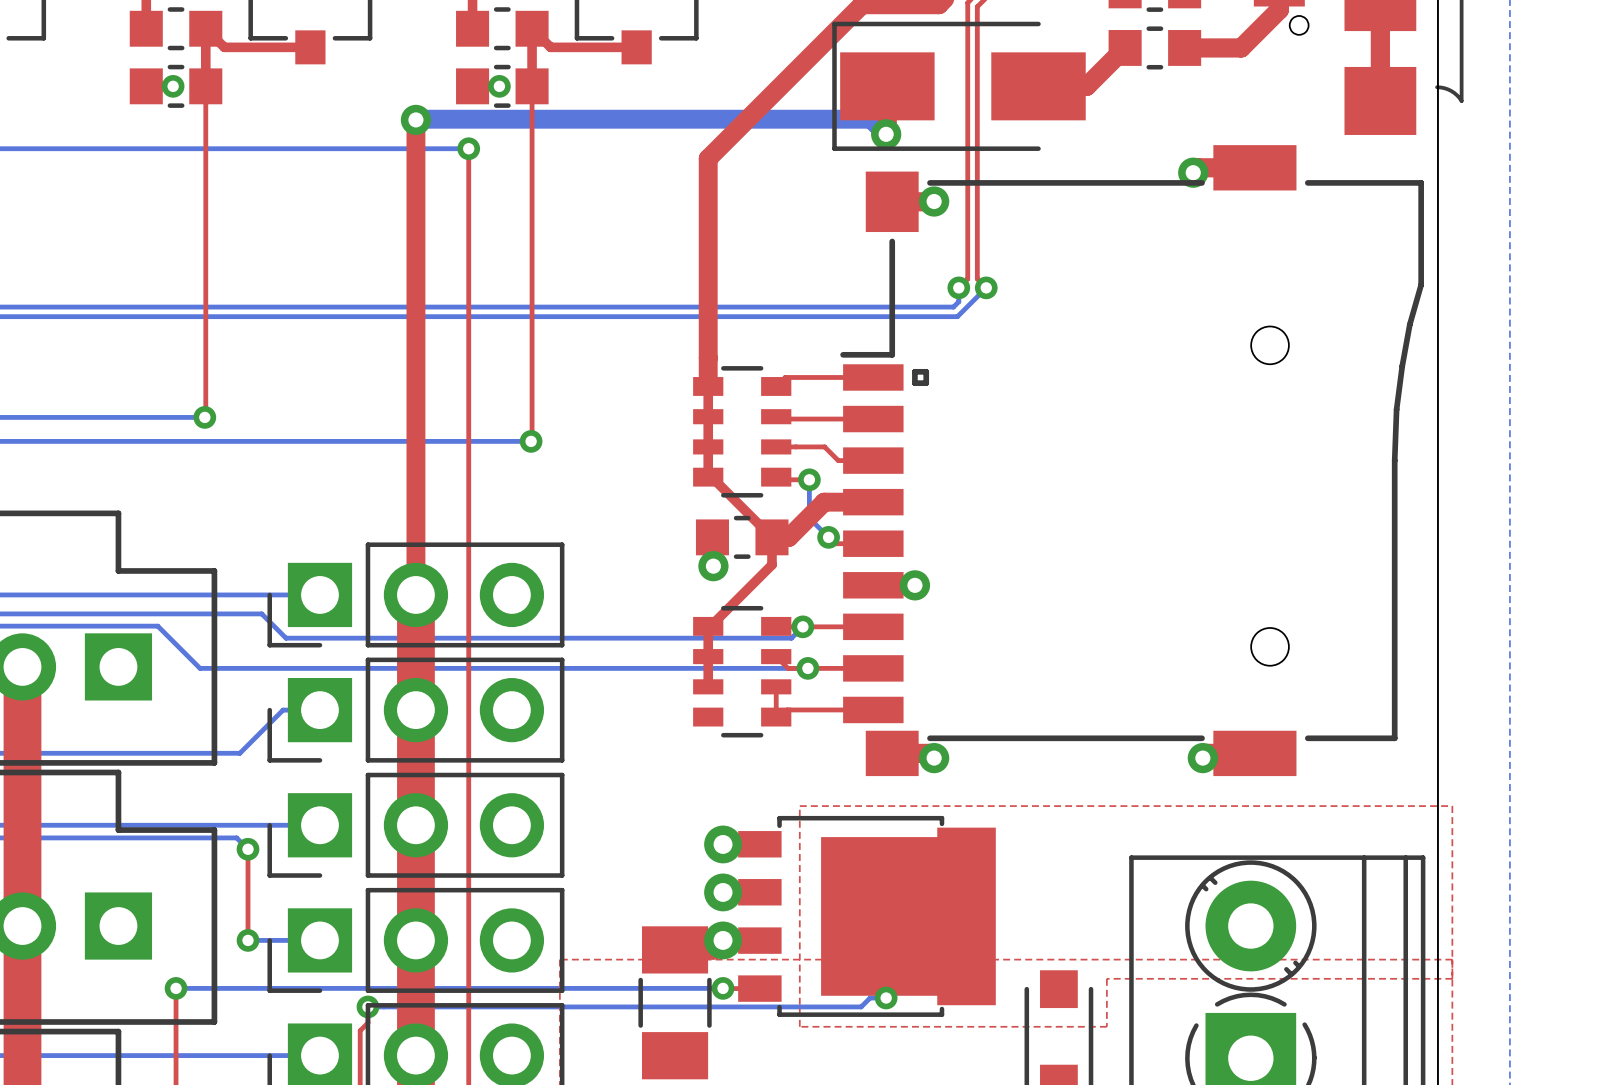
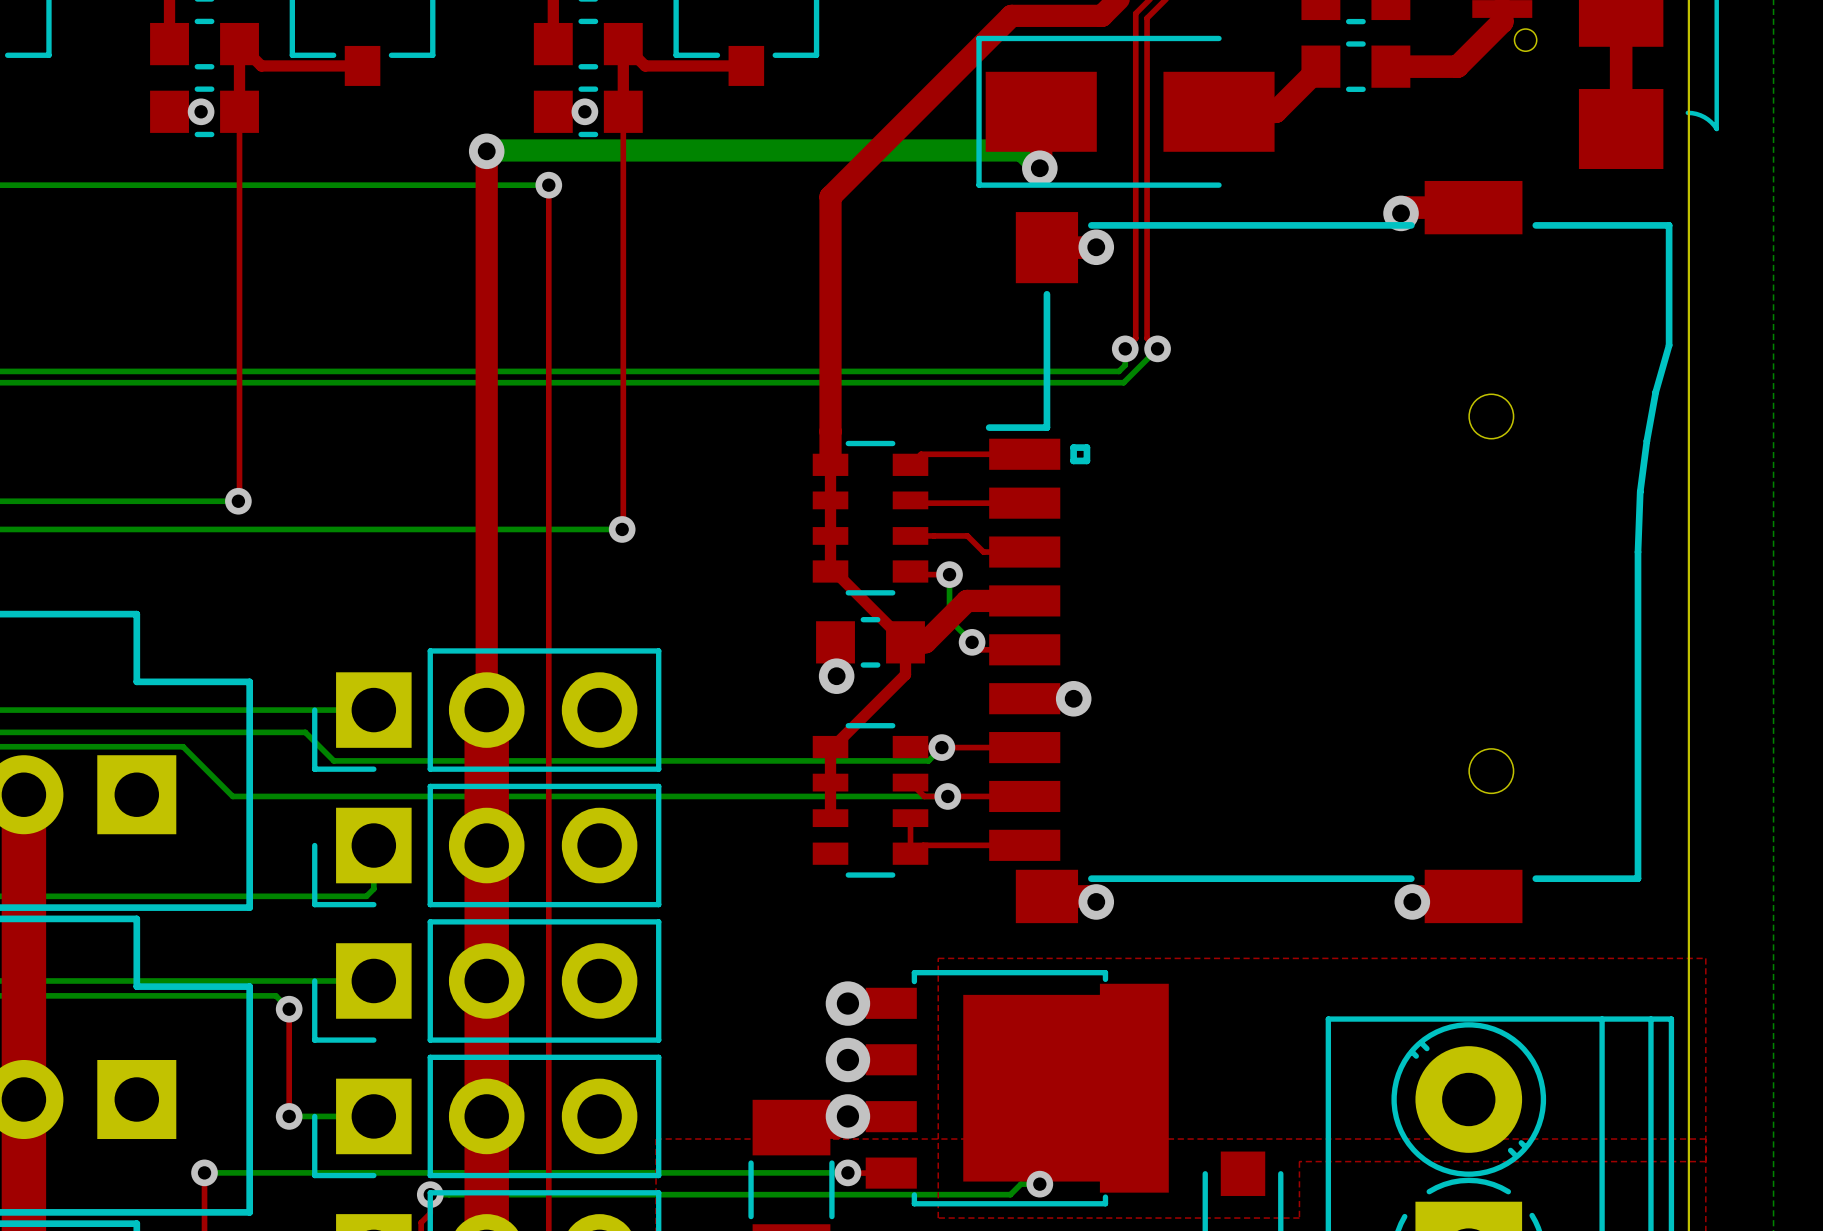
bottom track: (319, 710) (283, 710) (239, 753) -> (373, 845) (373, 888) (366, 896) (279, 896)

